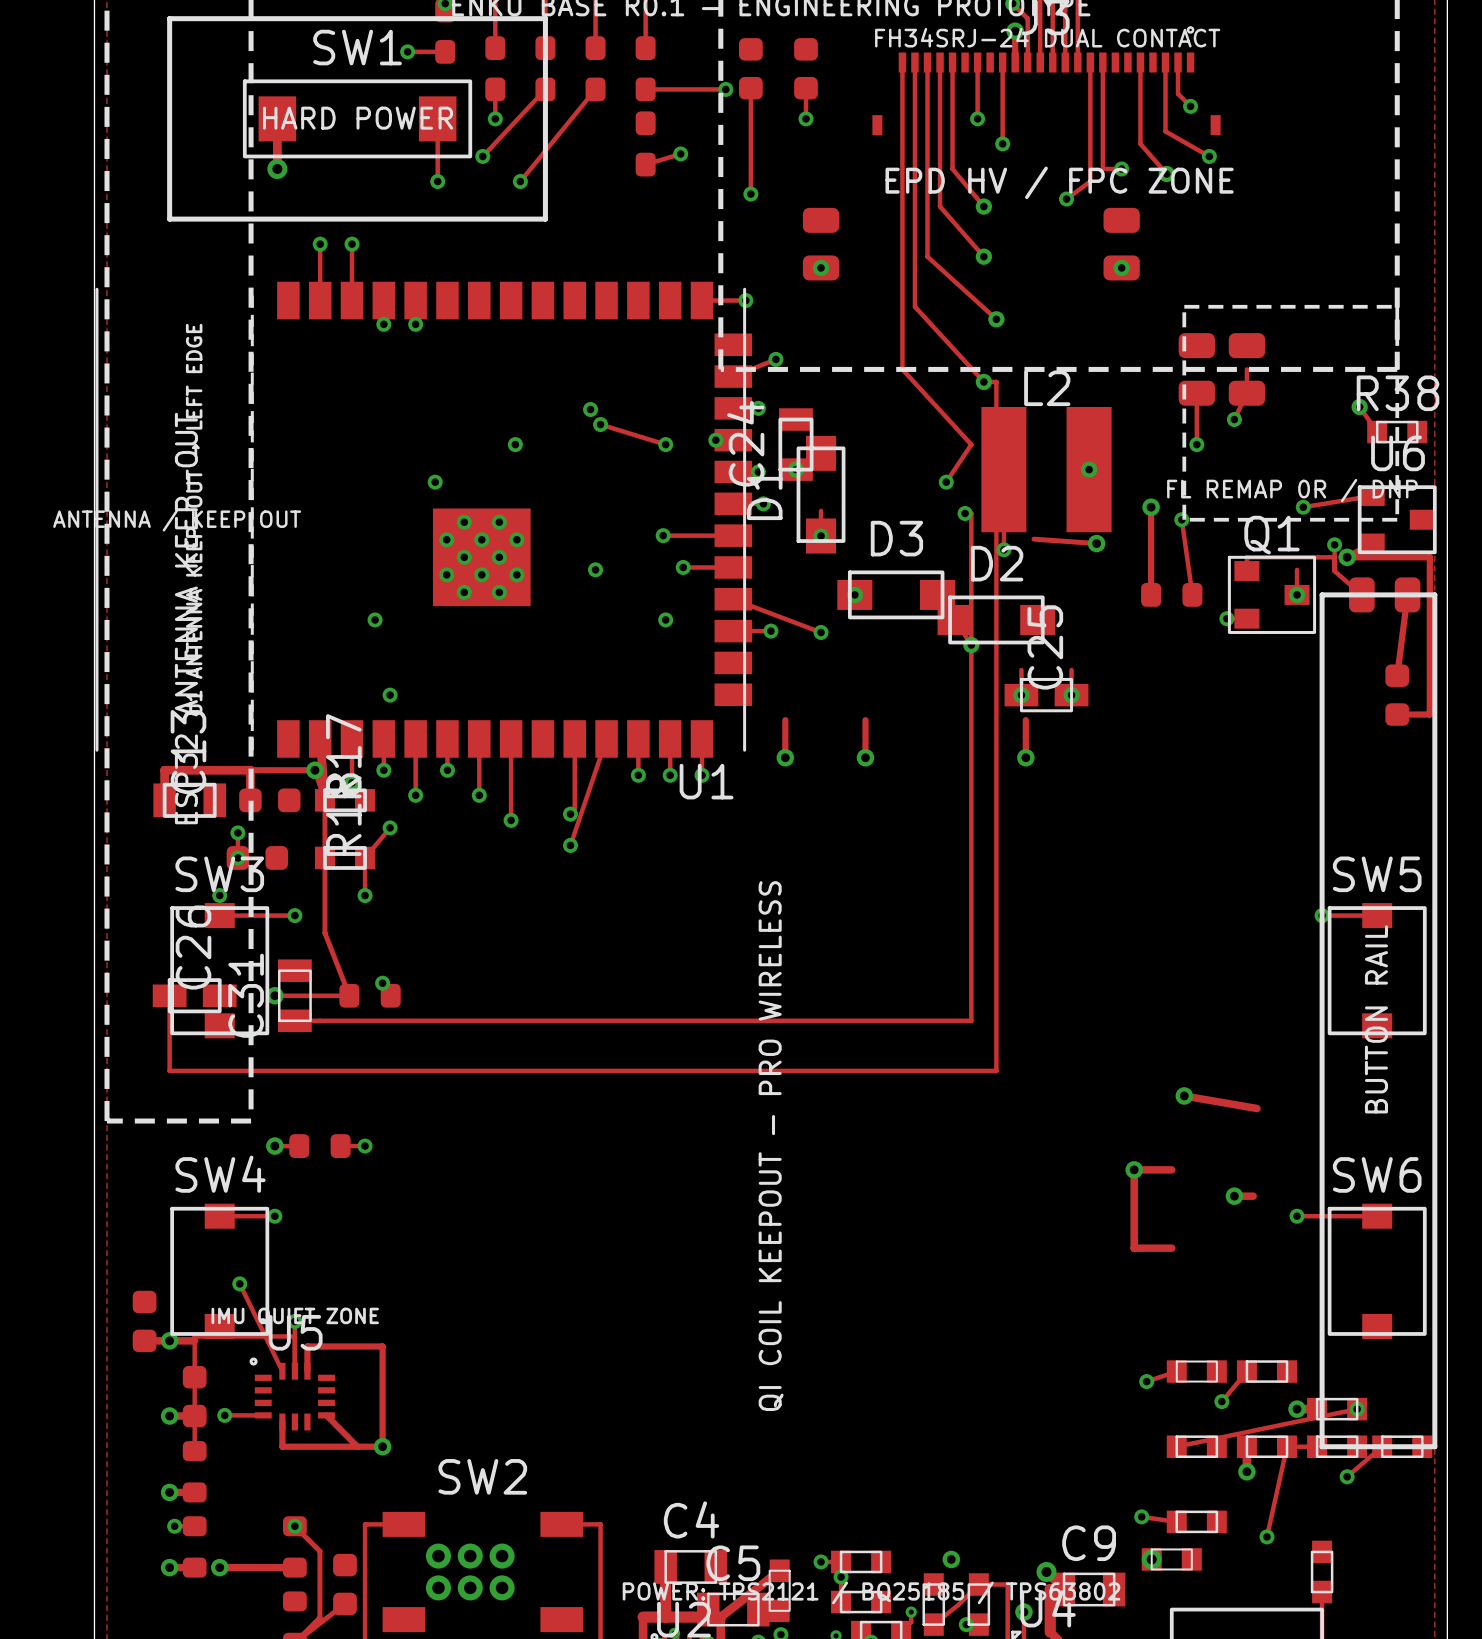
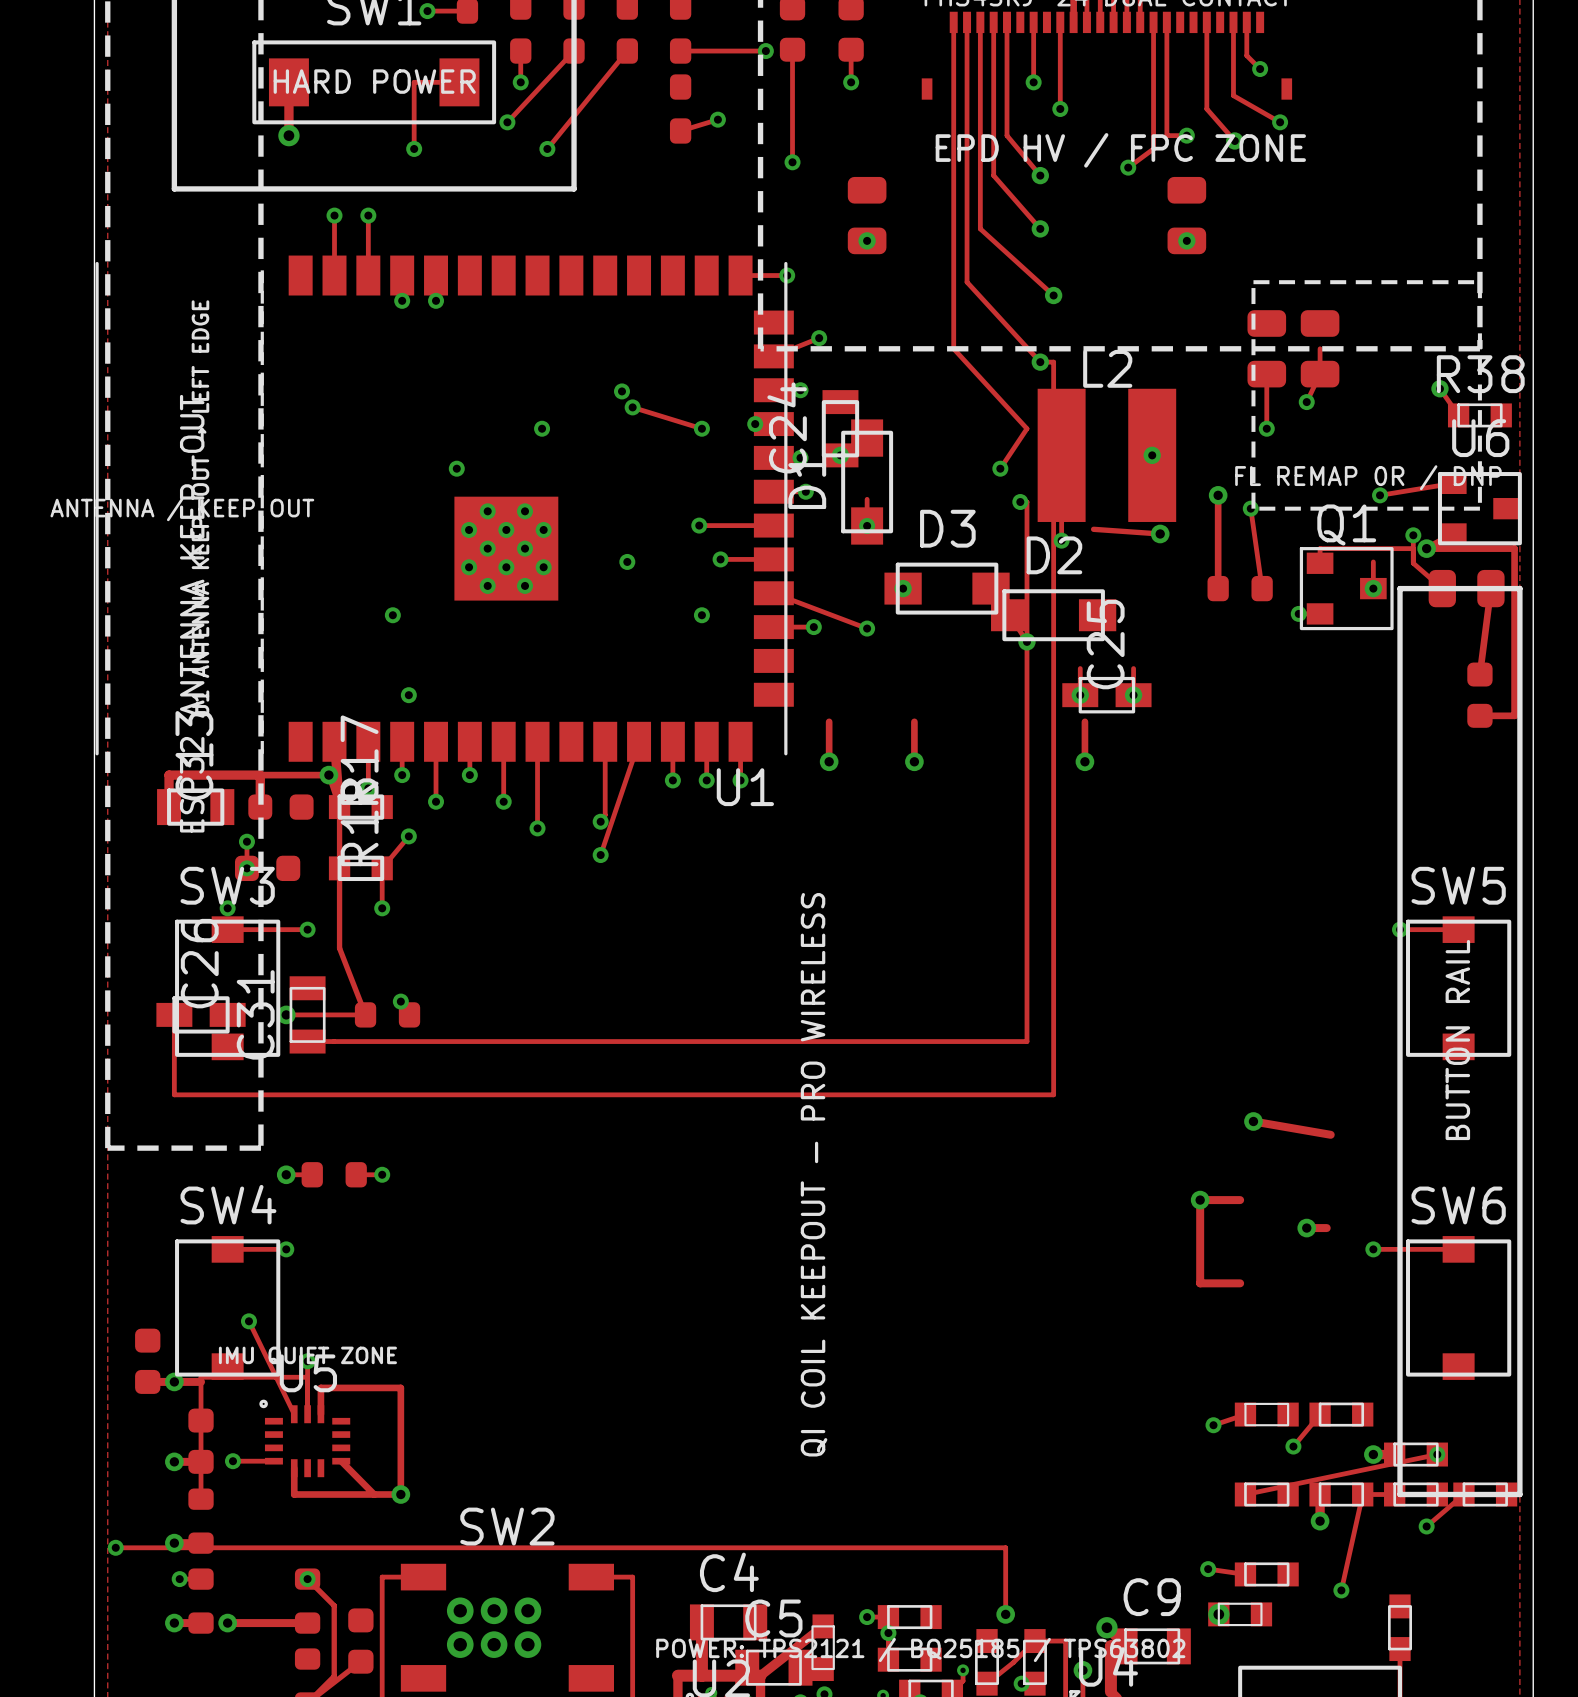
track: (437, 118) (437, 181) -> (459, 82) (414, 82) (414, 148)
via position: (437, 181) -> (414, 148)
track: none -> (115, 1547) (1005, 1547) (1005, 1614)
via: none -> (115, 1547)

